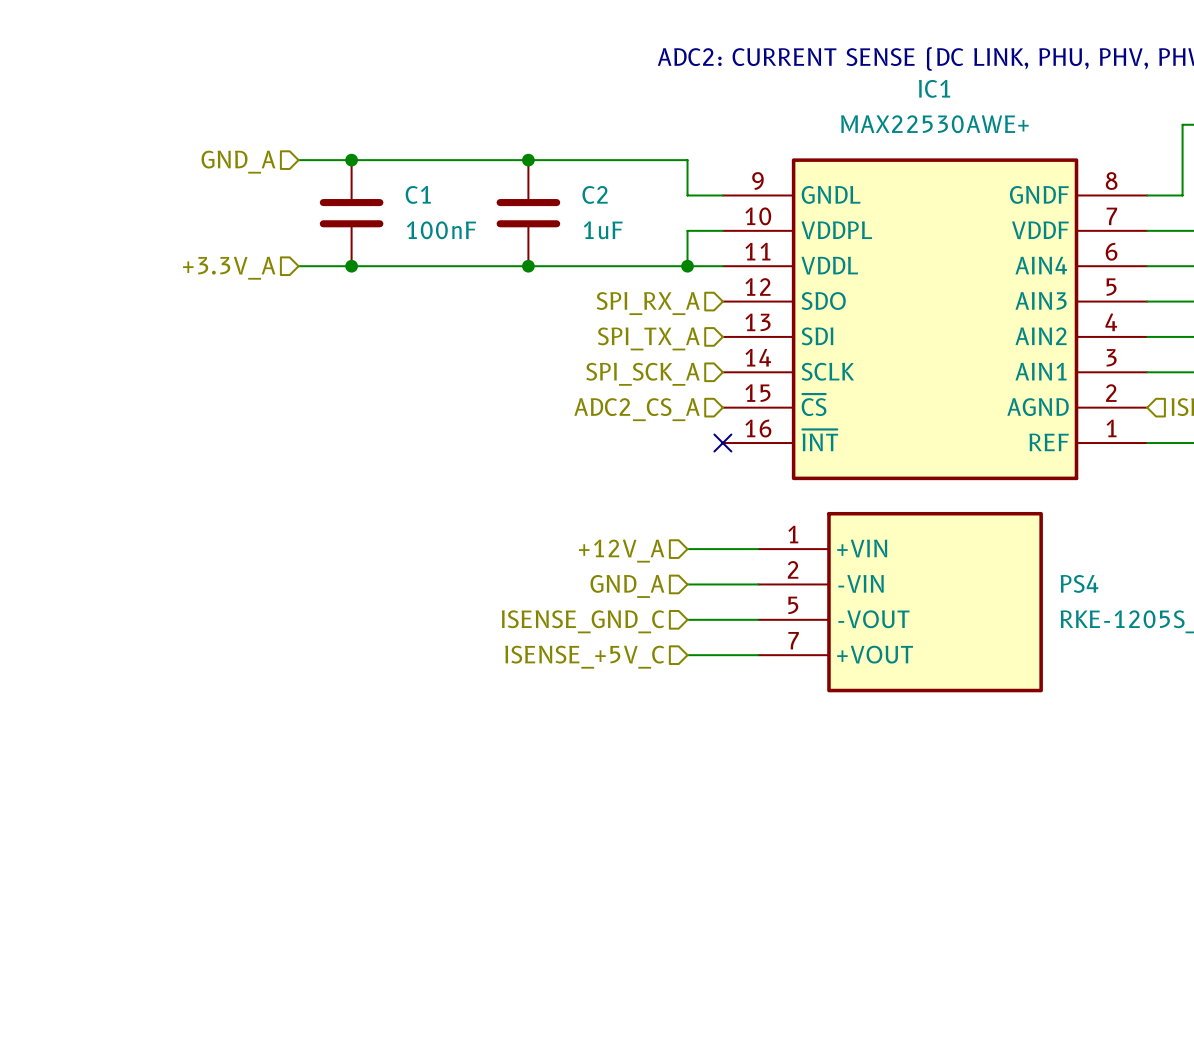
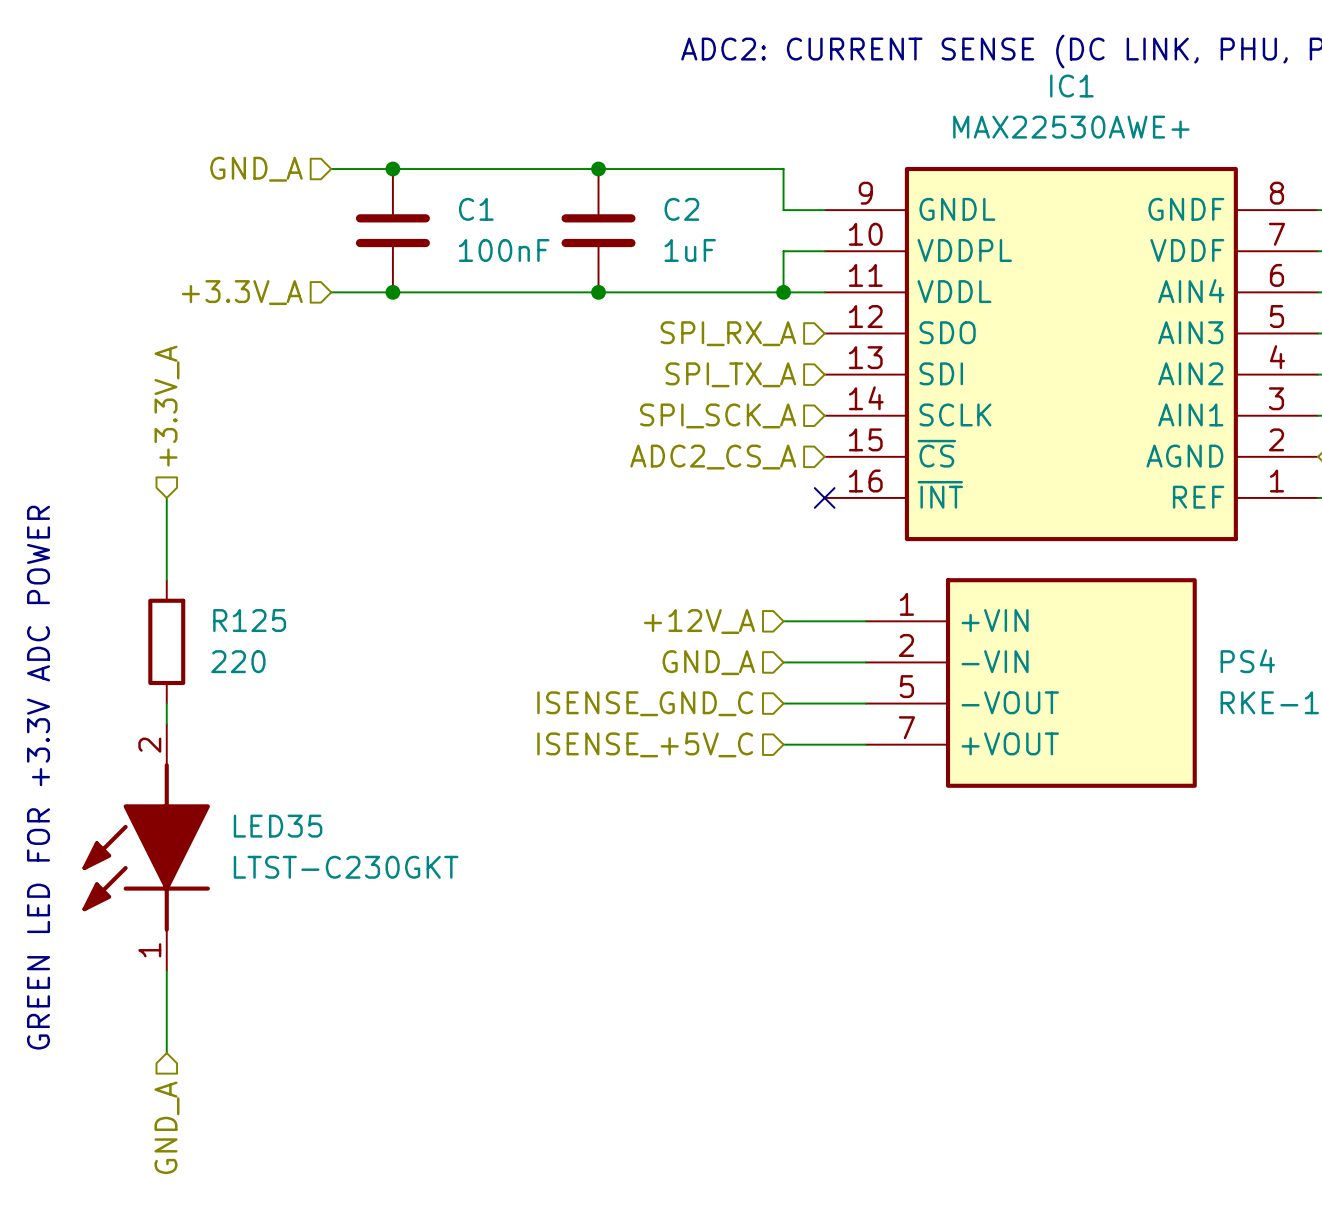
hierarchical label: none -> +3.3V_A (166, 406)
wire: none -> (166, 497) (166, 580)
R125: none -> 220 (166, 641)
wire: none -> (166, 703) (166, 724)
text: none -> GREEN LED FOR +3.3V ADC POWER (38, 777)
LED35: none -> LTST-C230GKT (146, 847)
wire: none -> (166, 970) (166, 1053)
hierarchical label: none -> GND_A (166, 1127)

